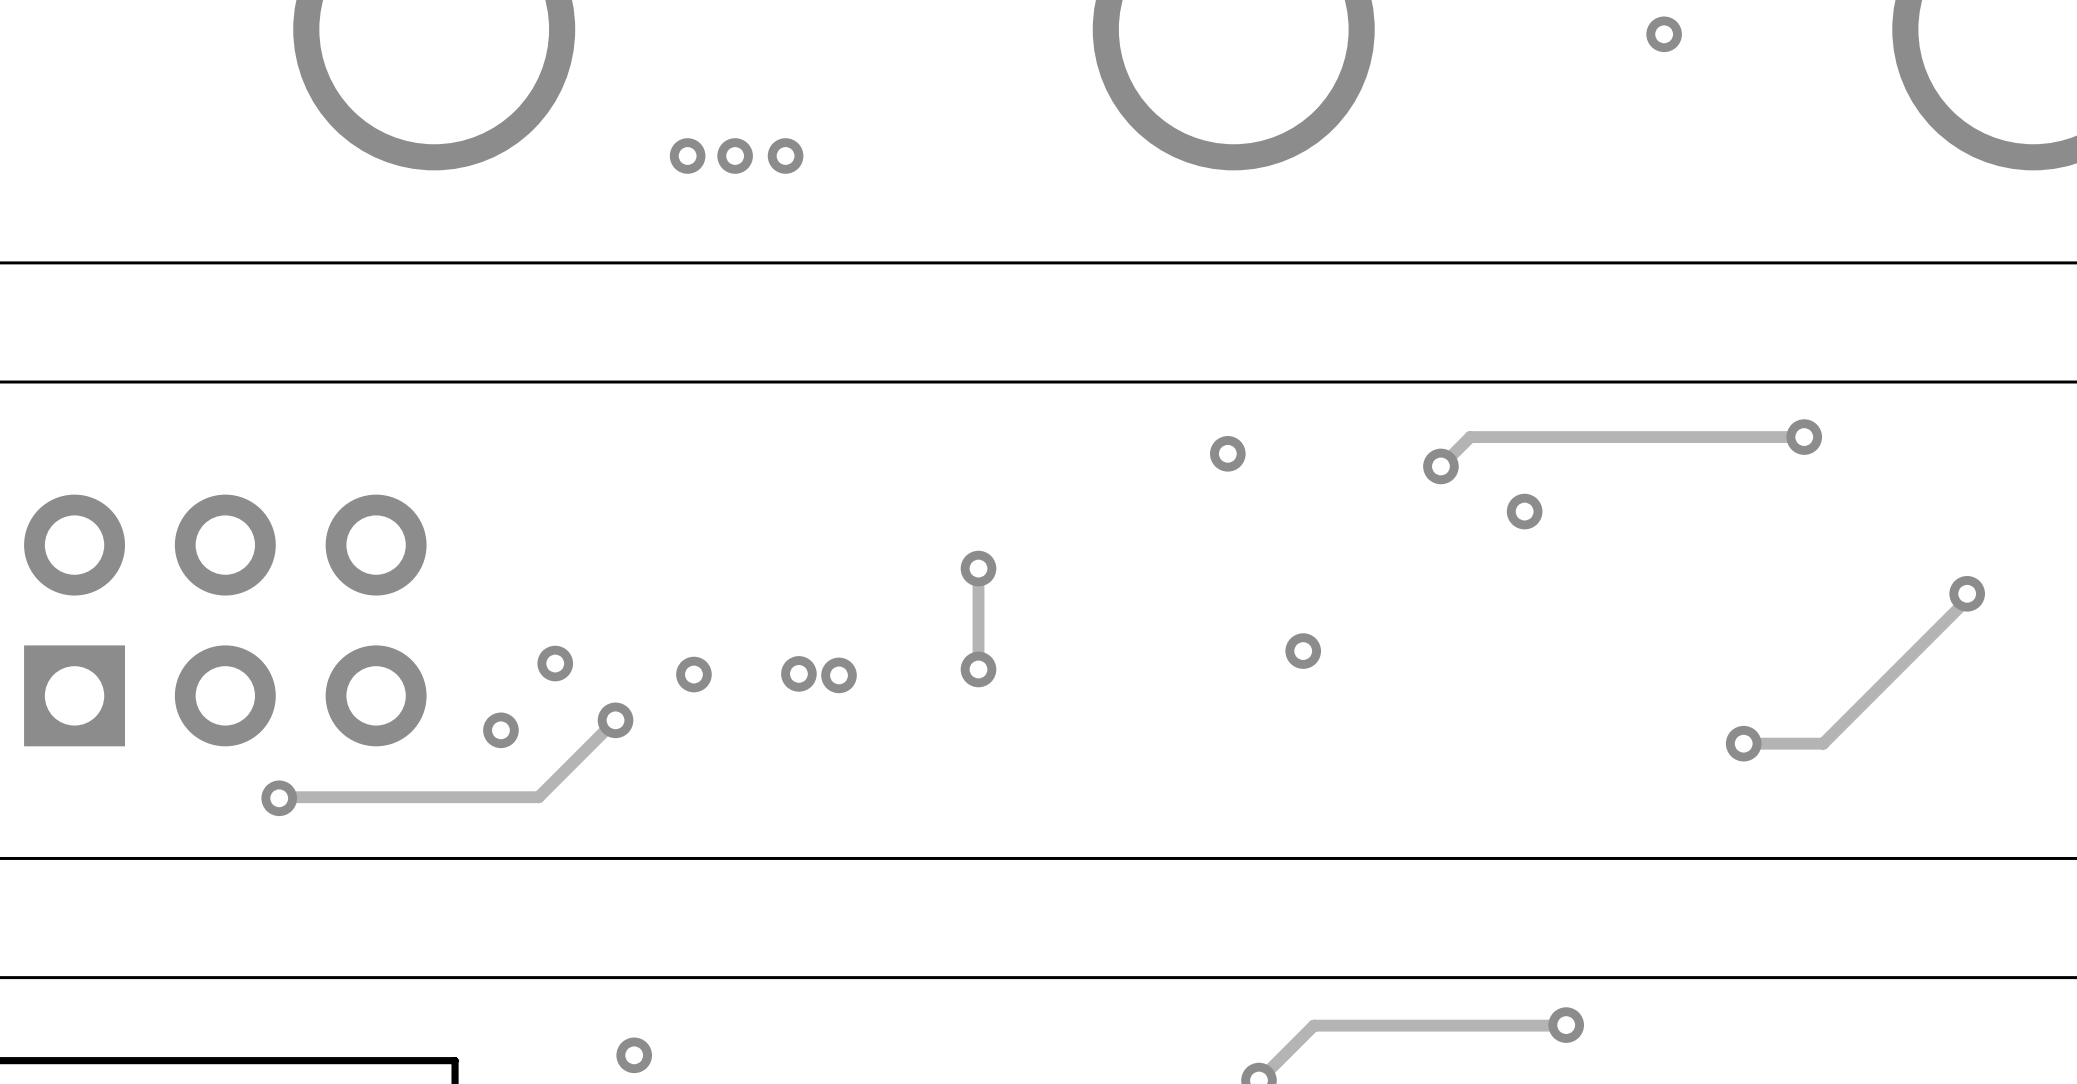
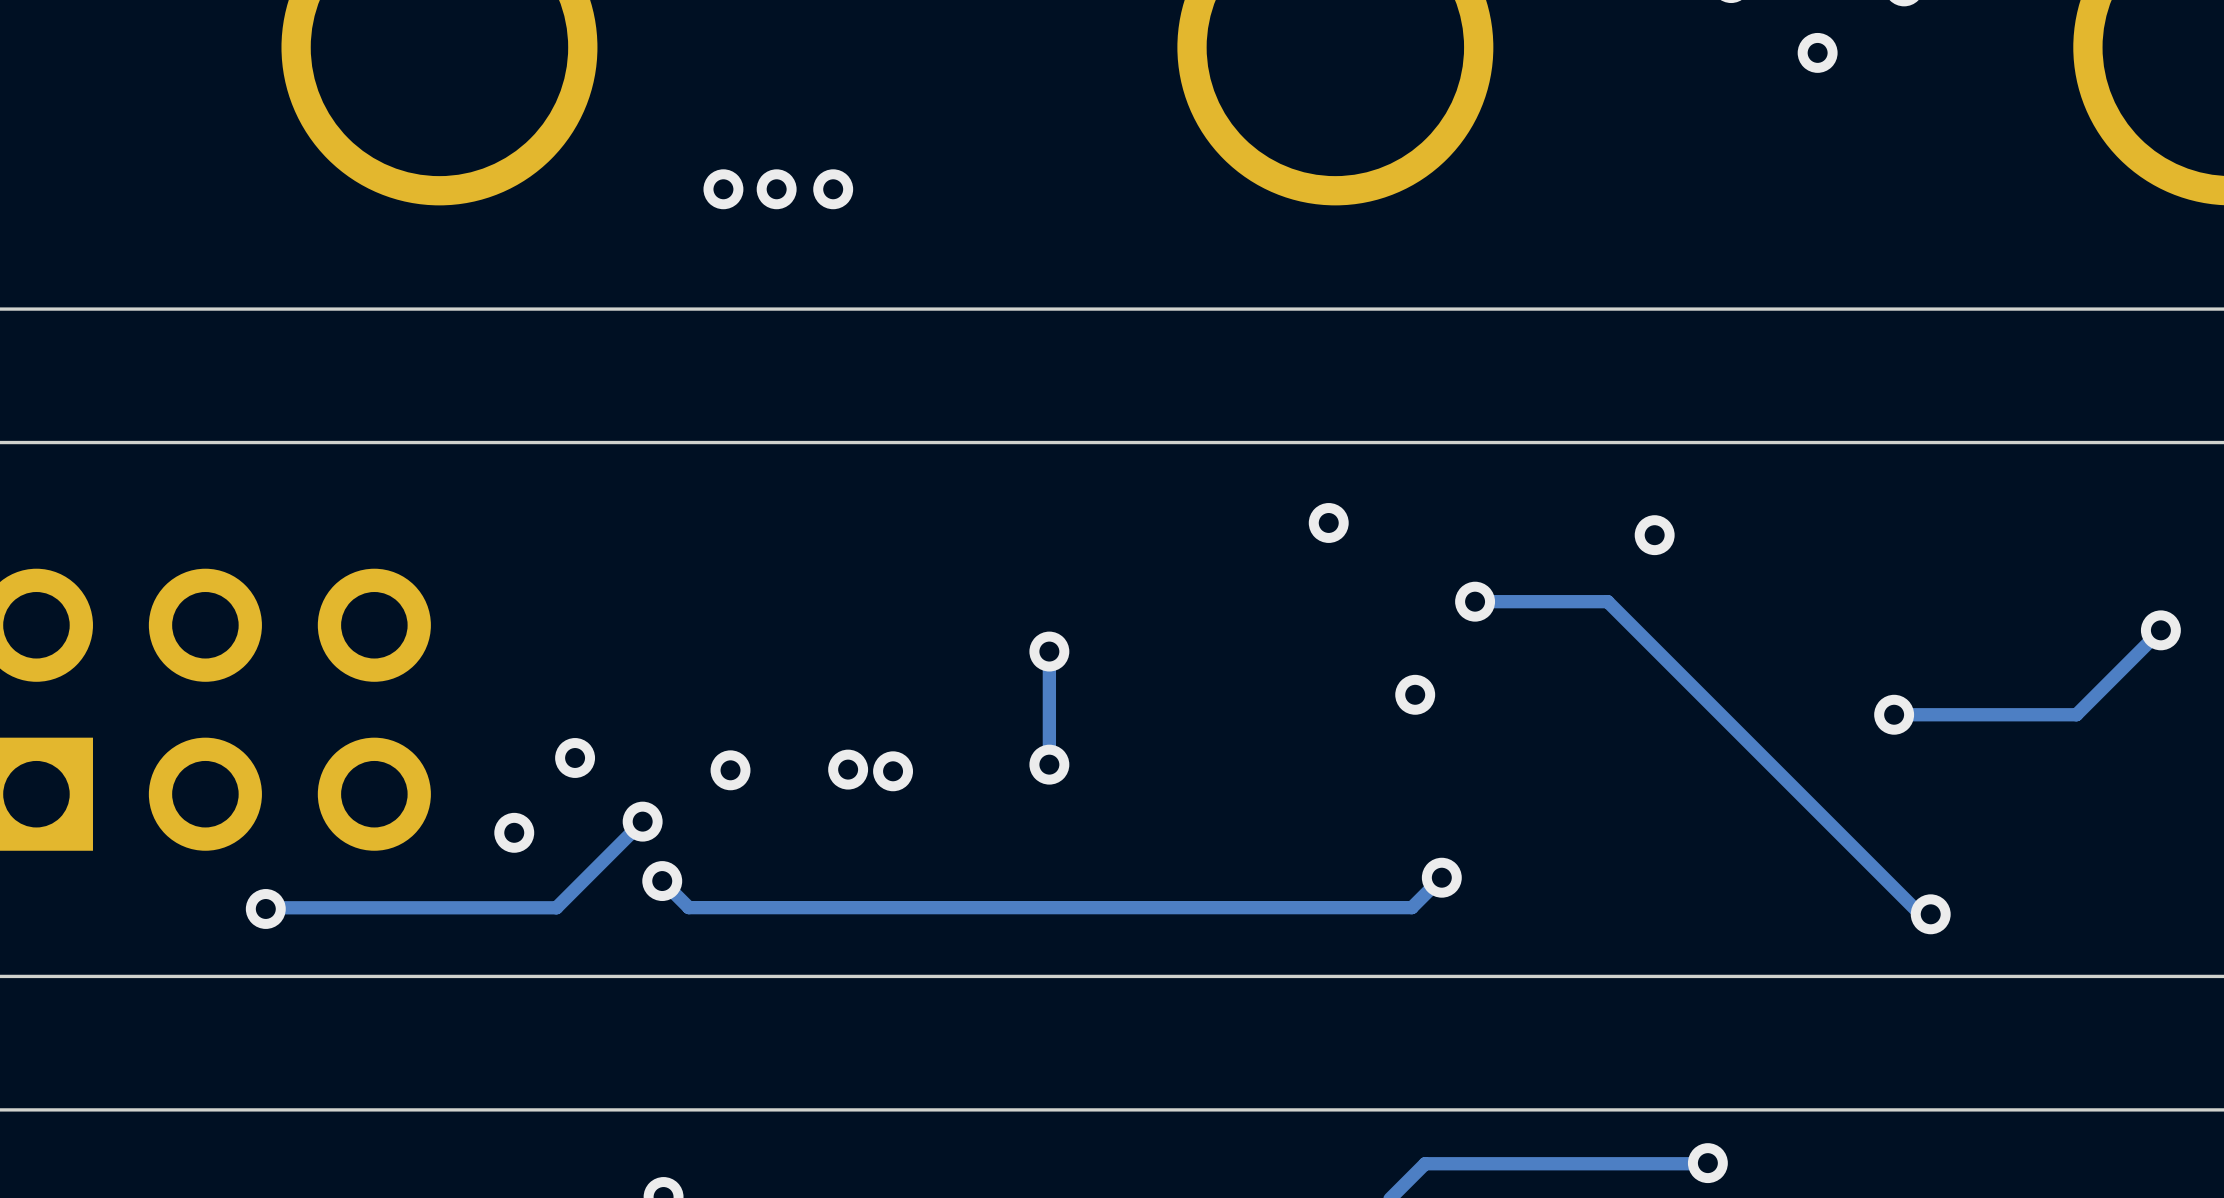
track: (1804, 437) (1470, 437) (1440, 466) -> none
via: (1804, 437) -> none
via: none -> (1654, 535)
via: (1440, 466) -> none
via: (1524, 511) -> none
track: none -> (1475, 601) (1607, 601) (1920, 914) (1930, 914)
via: none -> (1475, 601)
track: none -> (2160, 630) (2076, 714) (1894, 714)
track: (1967, 593) (1967, 599) (1823, 743) (1743, 743) -> none
via position: (1967, 593) -> (2160, 630)
via: none -> (1894, 714)
via position: (1303, 651) -> (1415, 694)
via: (1743, 743) -> none
track: none -> (1441, 877) (1411, 907) (688, 907) (662, 881)
via: none -> (1441, 877)
via: none -> (662, 881)
via: none -> (1930, 914)

